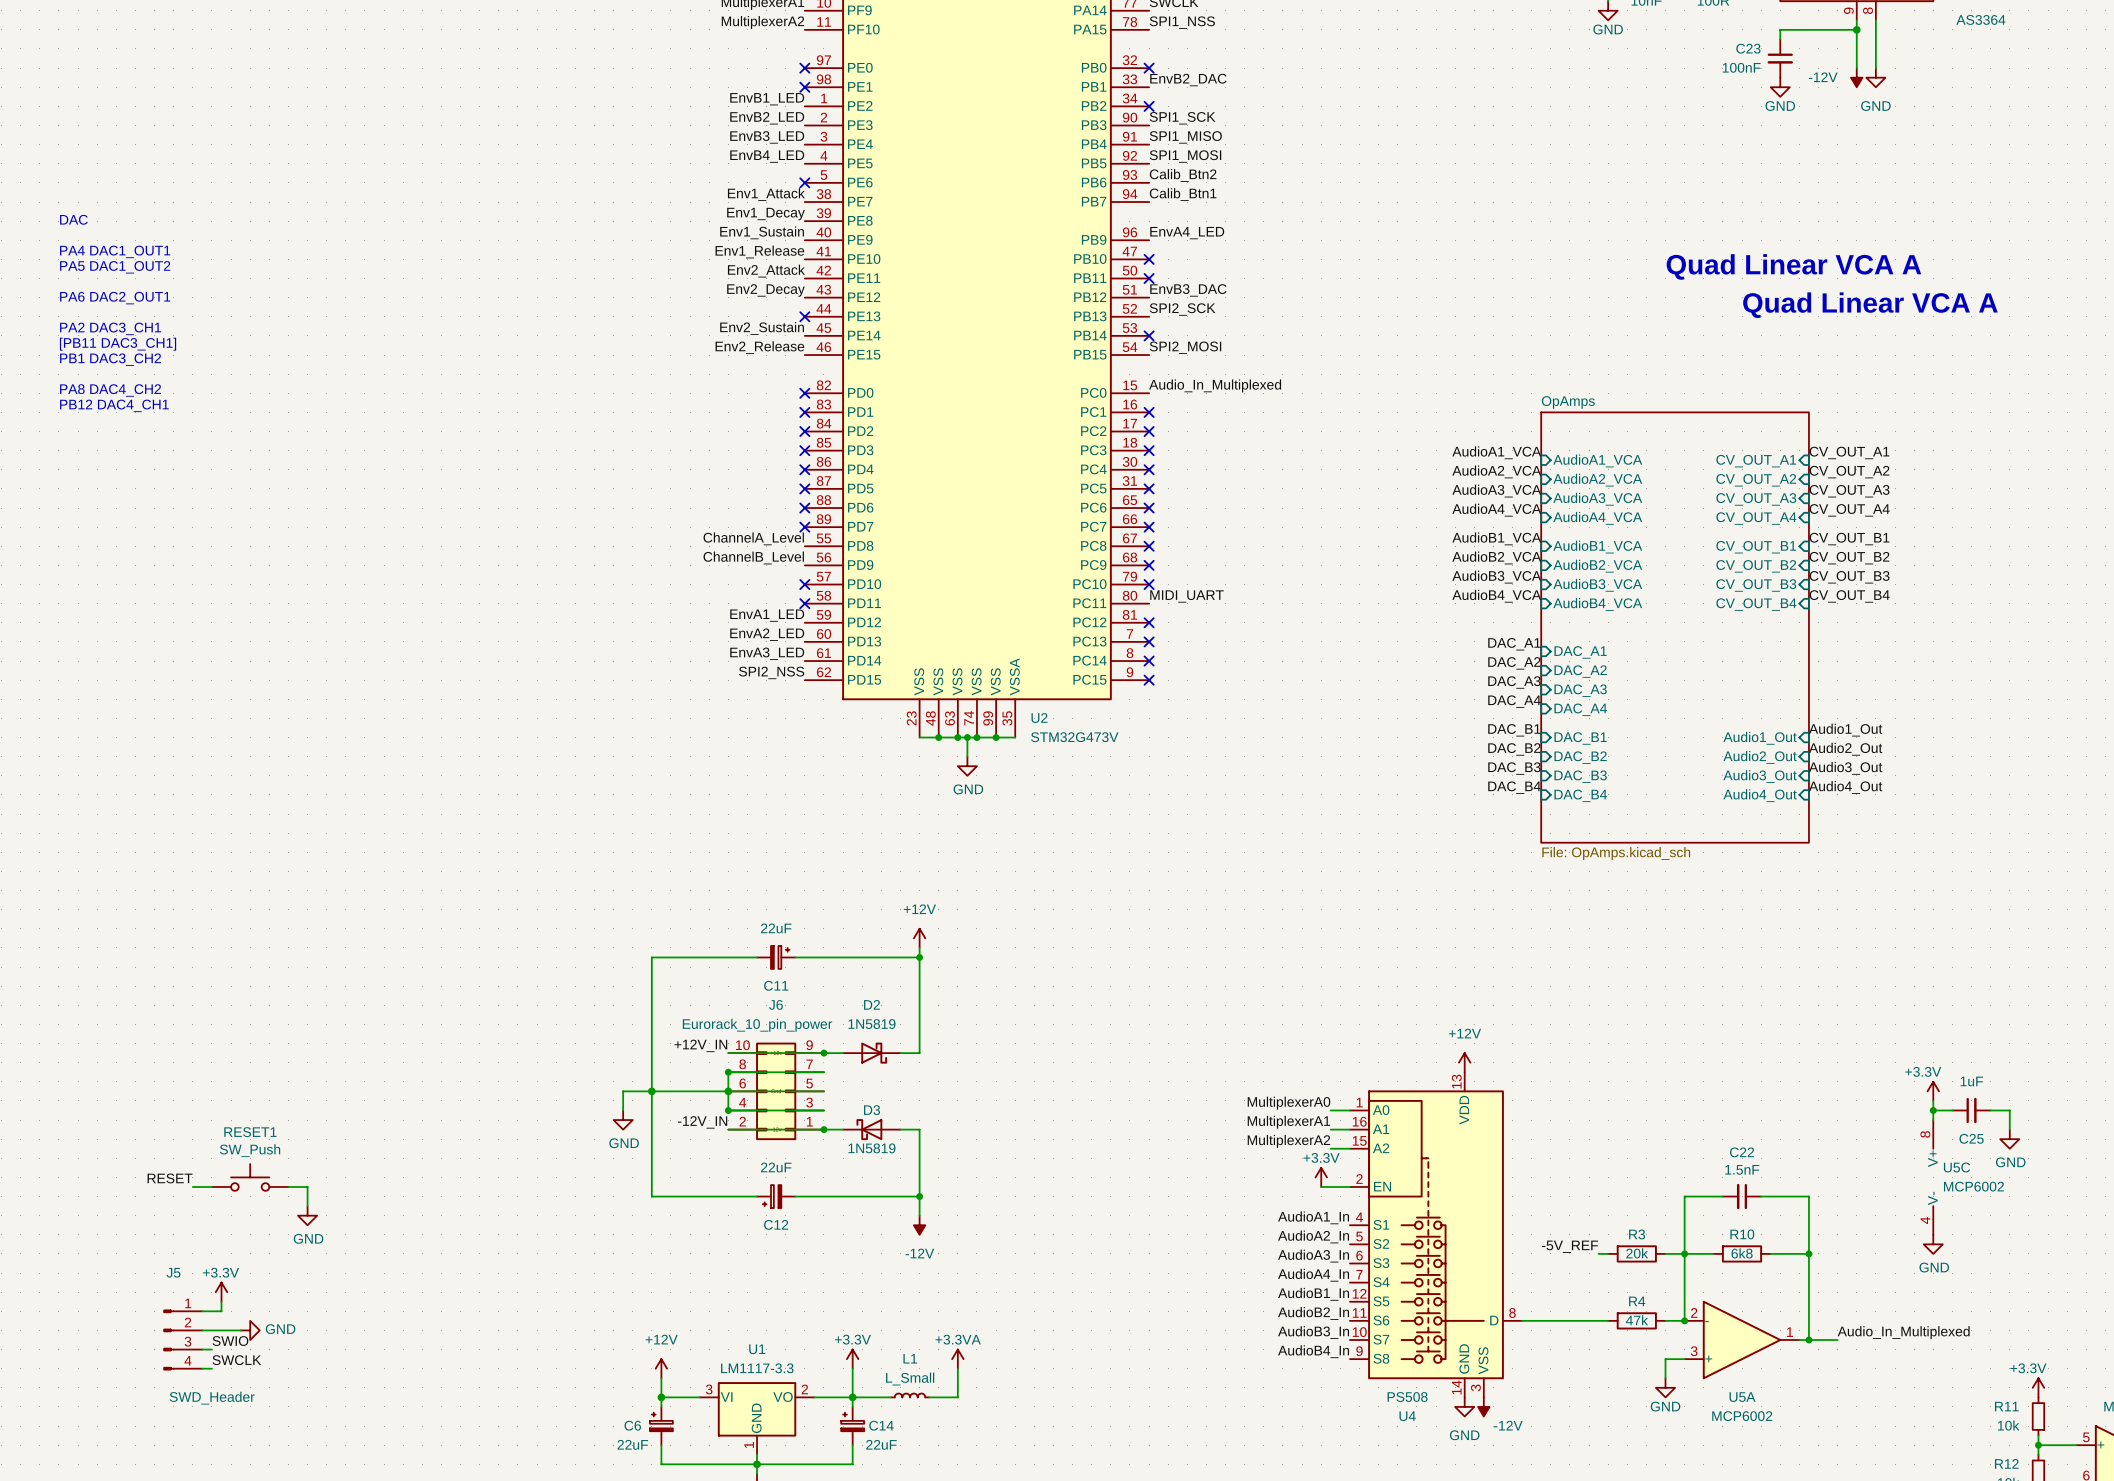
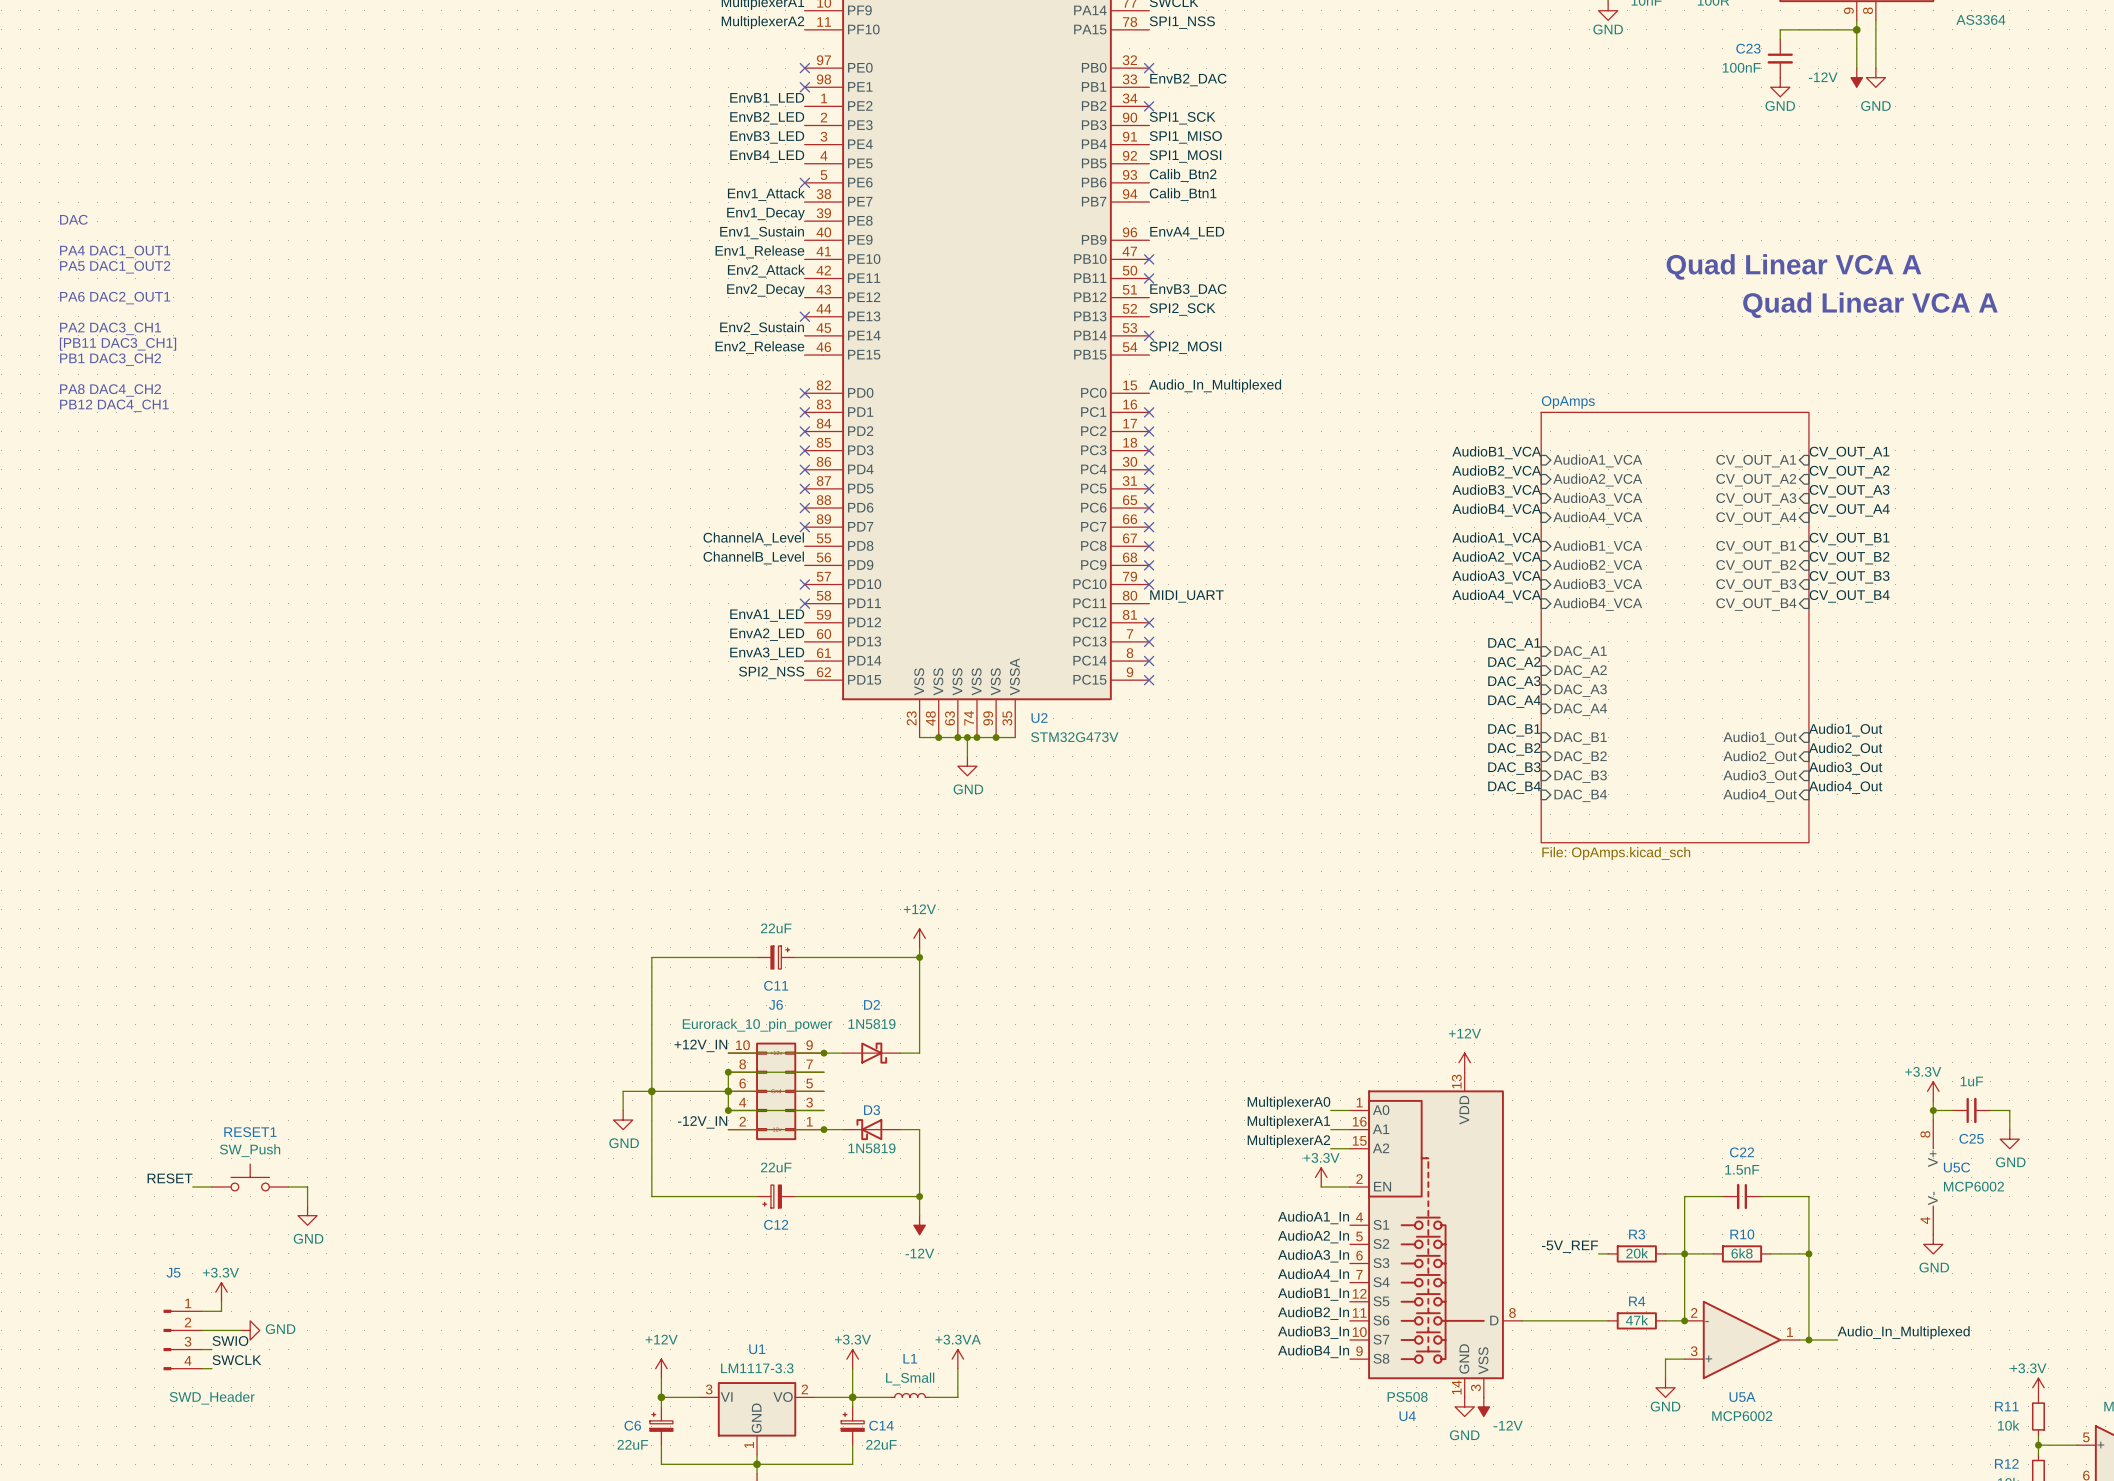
label: AudioA1_VCA (1496, 452) -> AudioB1_VCA (1496, 452)
label: AudioA2_VCA (1496, 471) -> AudioB2_VCA (1496, 471)
label: AudioA3_VCA (1496, 491) -> AudioB3_VCA (1496, 491)
label: AudioA4_VCA (1496, 510) -> AudioB4_VCA (1496, 510)
label: AudioB1_VCA (1496, 538) -> AudioA1_VCA (1496, 538)
label: AudioB2_VCA (1496, 557) -> AudioA2_VCA (1496, 557)
label: AudioB3_VCA (1496, 577) -> AudioA3_VCA (1496, 577)
label: AudioB4_VCA (1496, 596) -> AudioA4_VCA (1496, 596)

